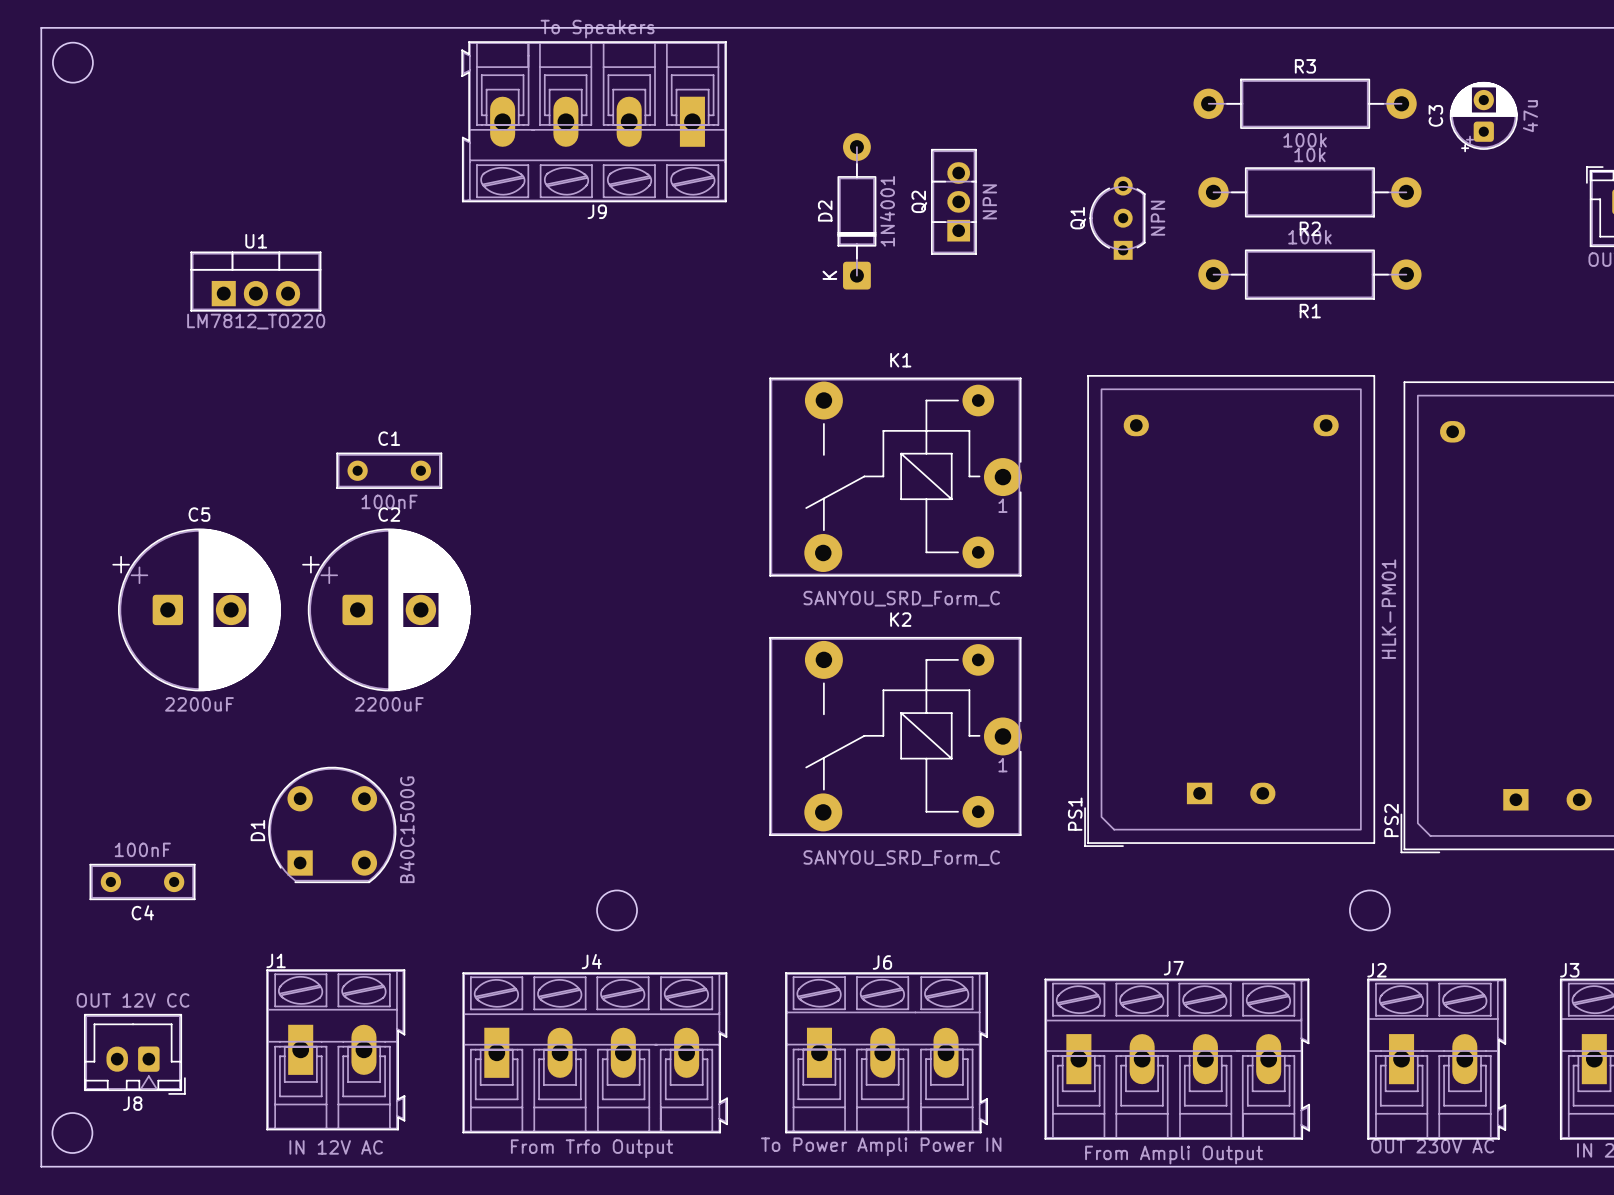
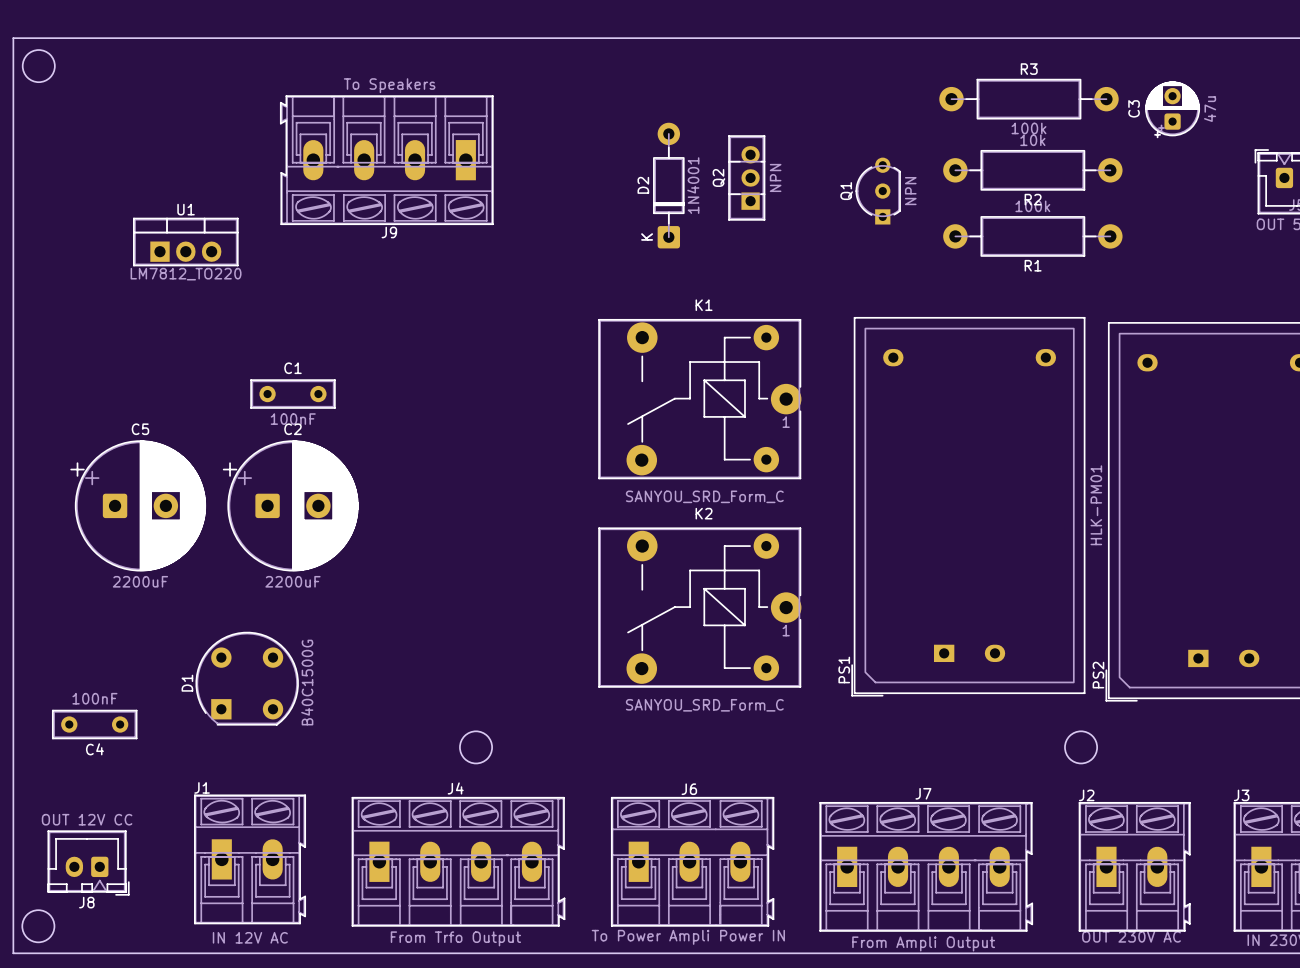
J9 position: (594, 121) -> (386, 160)

